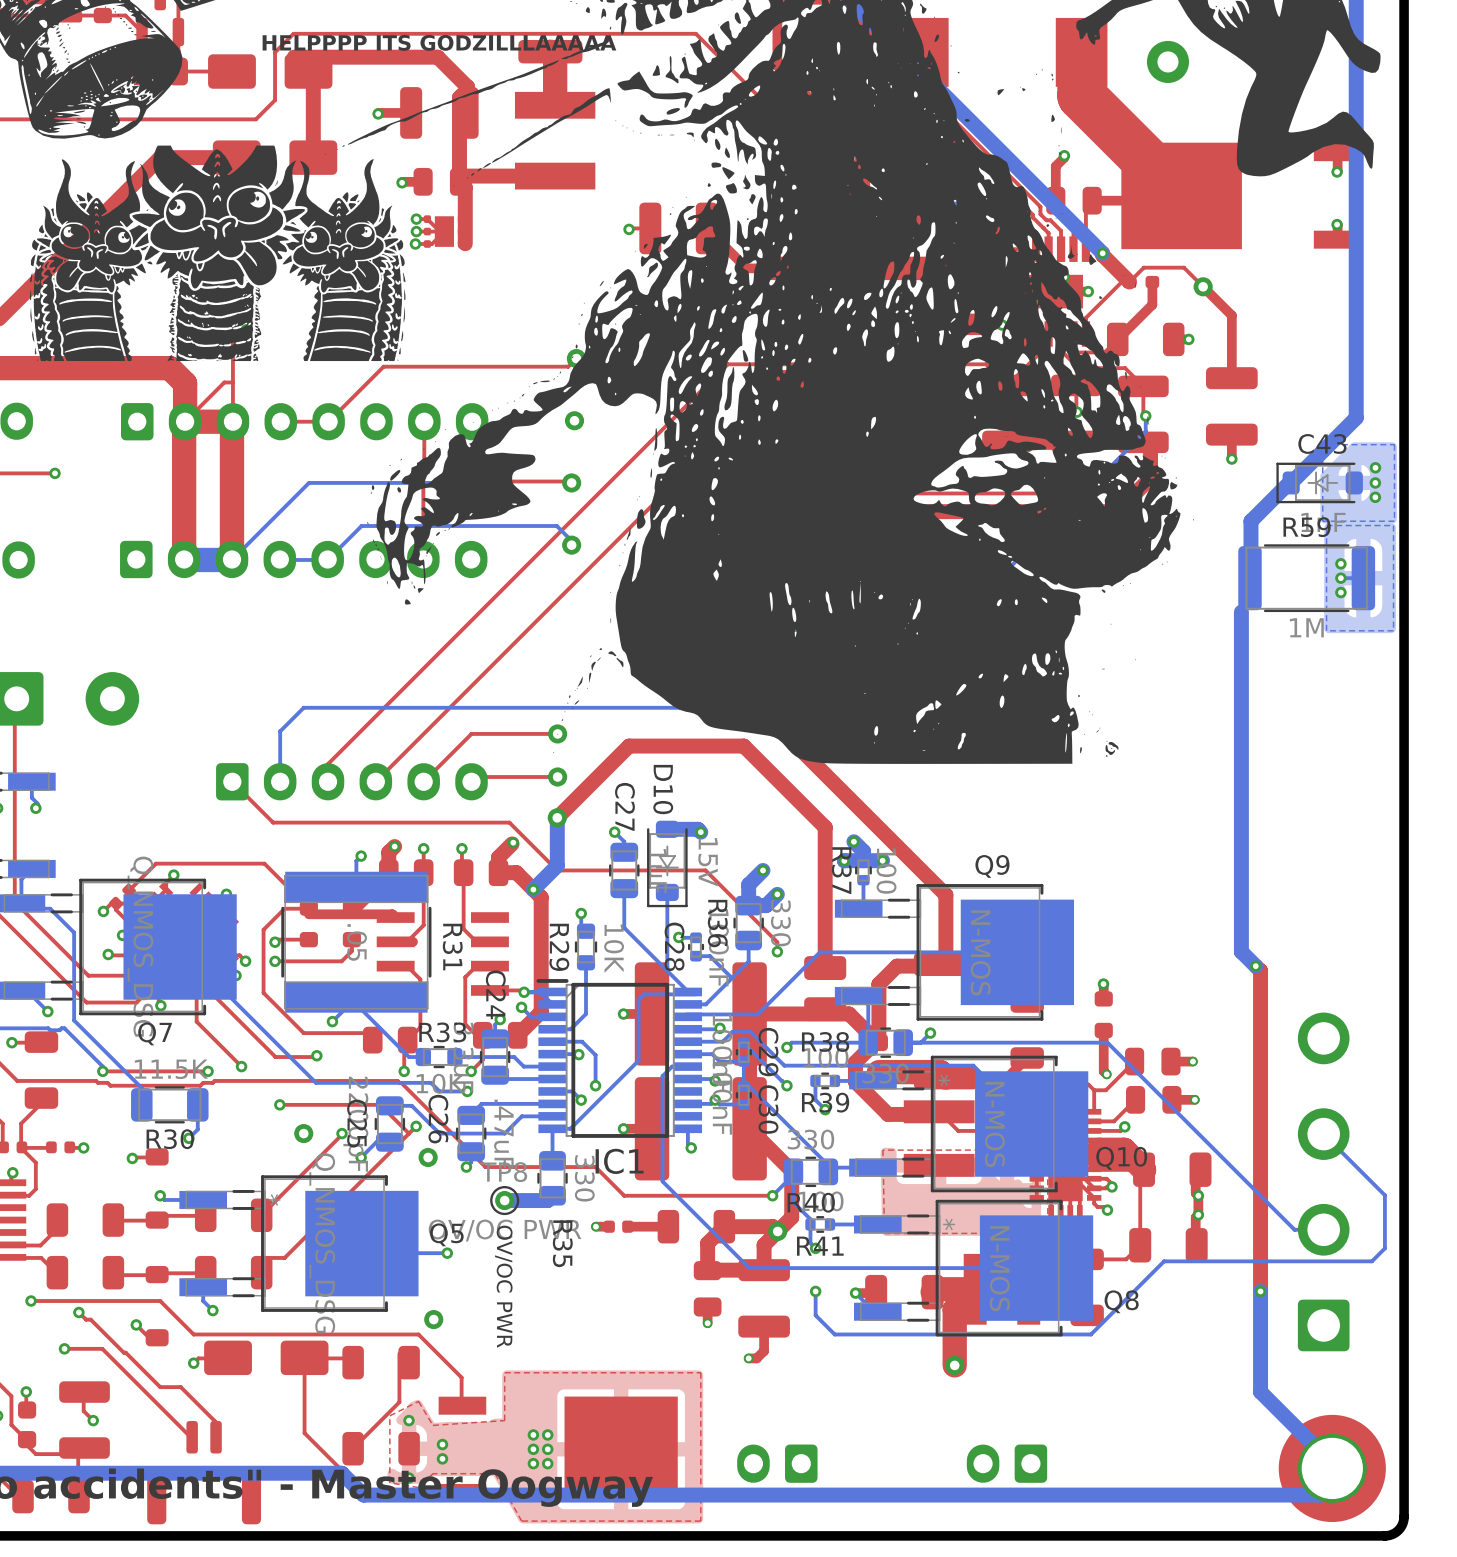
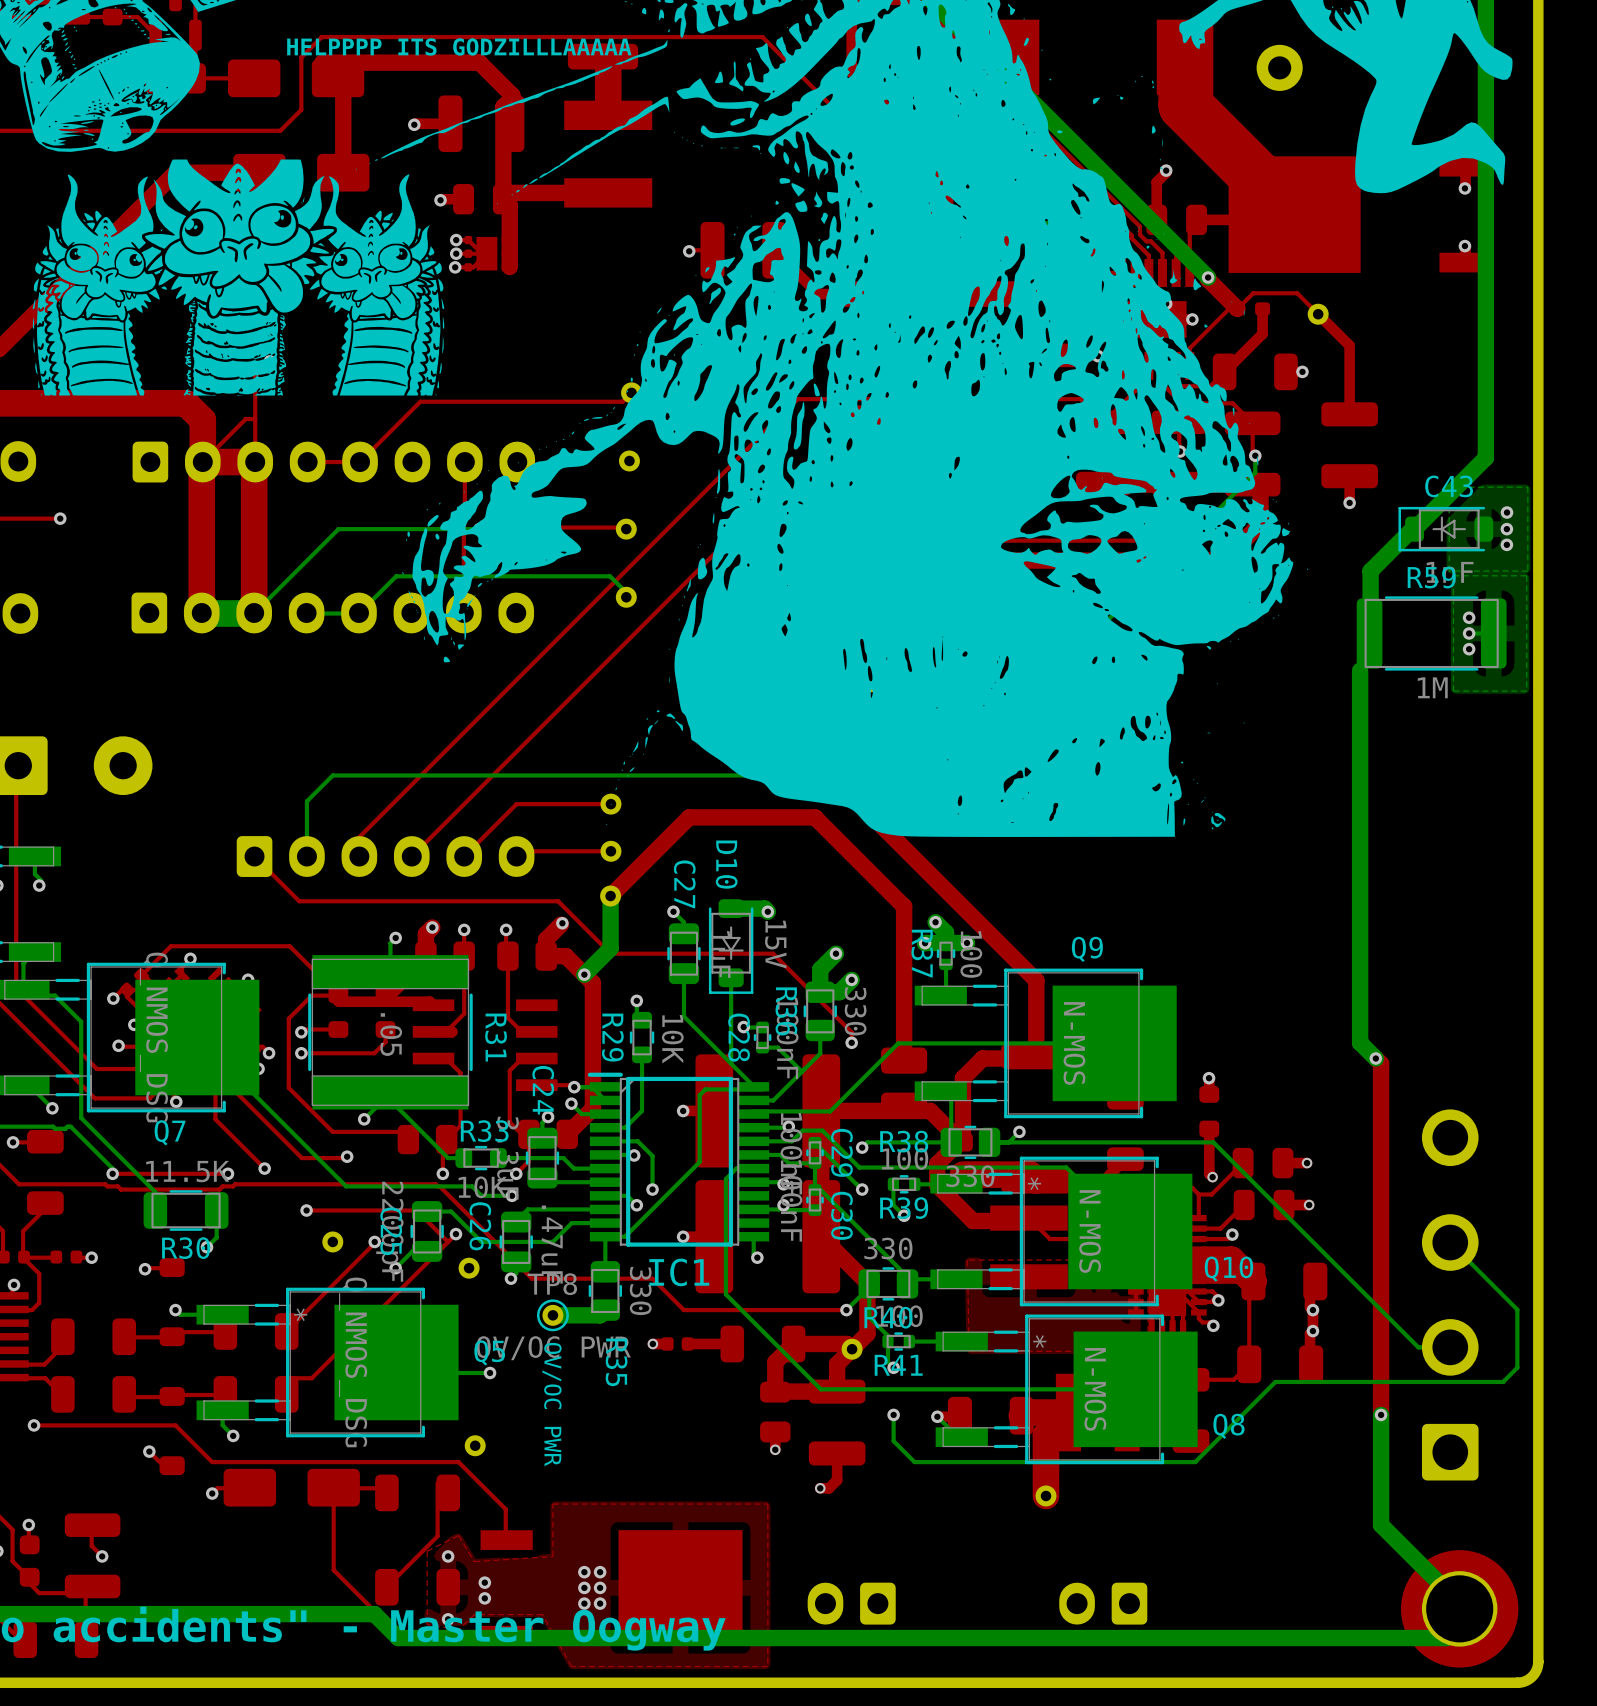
top track: (78, 1312) (86, 1319) (90, 1319) (160, 1387) (180, 1387) (215, 1421) (215, 1437) -> none
via: (78, 1312) -> none
top track: (64, 1348) (102, 1348) (191, 1437) -> none
via: (64, 1348) -> none
part: (204, 1472) -> none

